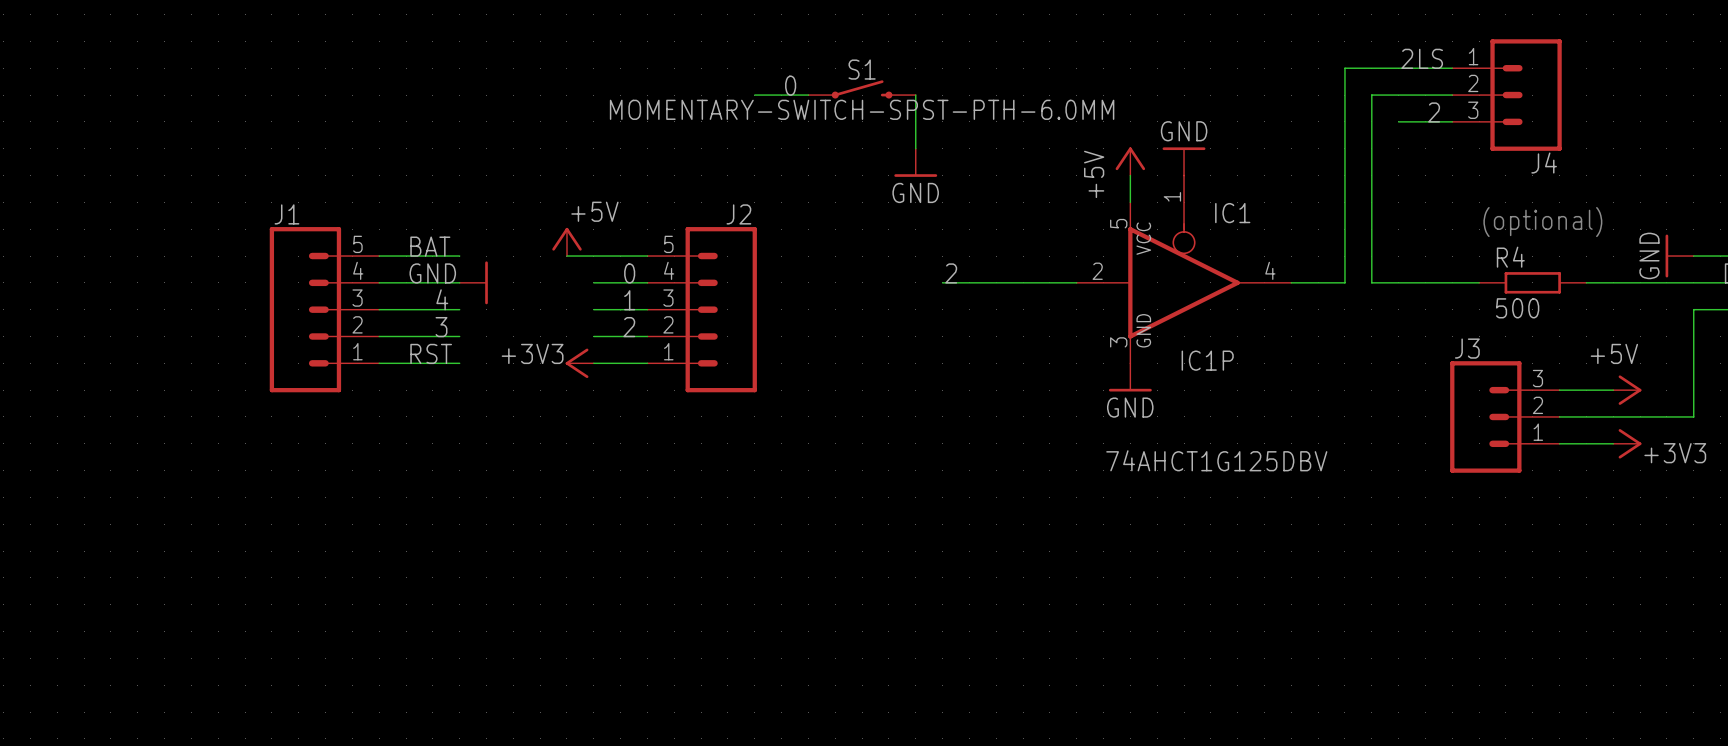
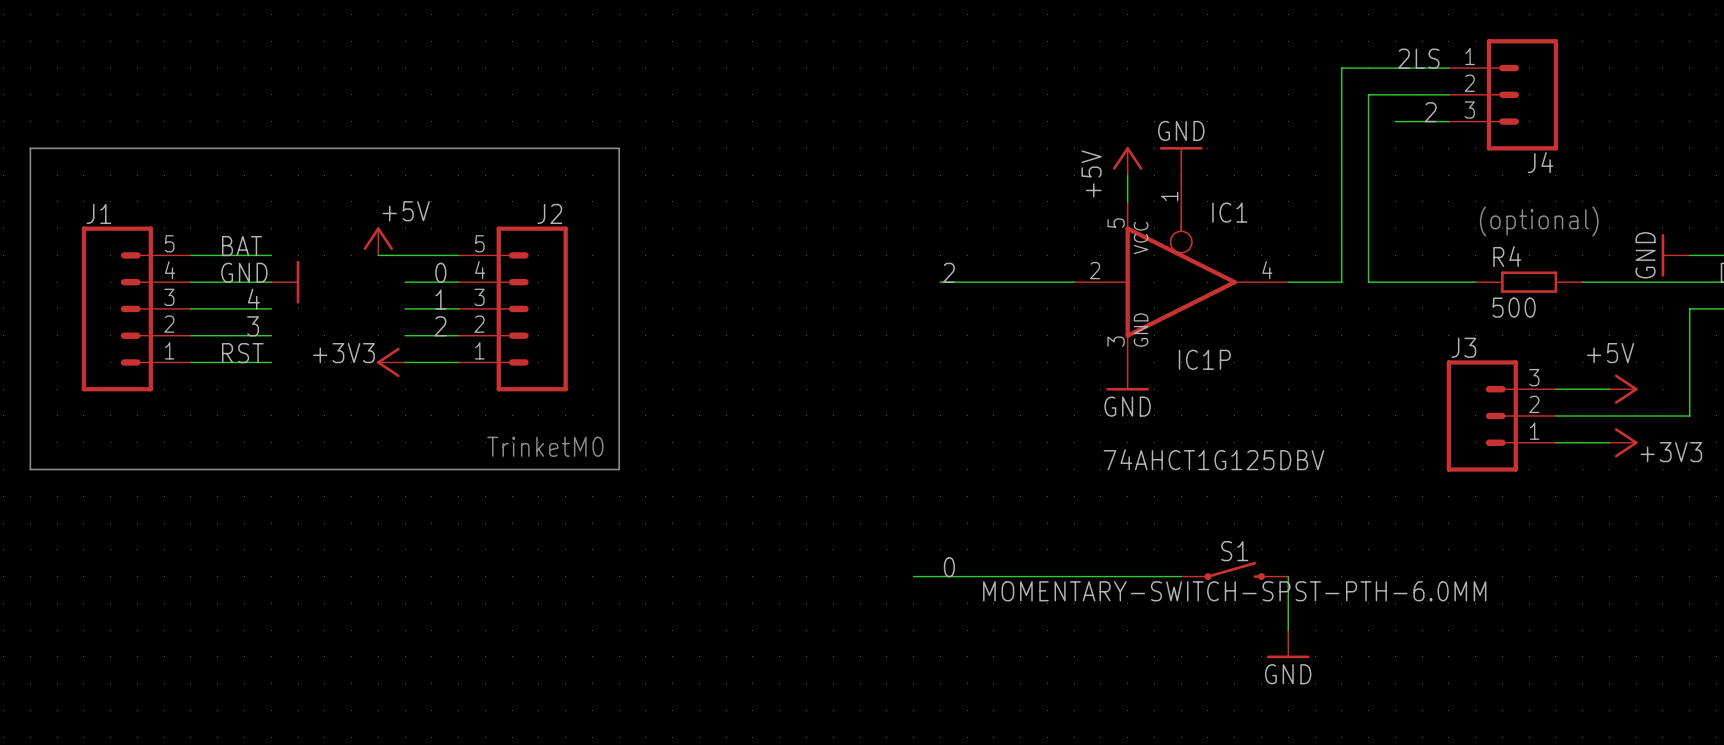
label: 0 (790, 85) -> none
S1 position: (862, 89) -> (1234, 570)
wire: (754, 95) (808, 95) -> none
wire: (915, 95) (915, 148) -> none
line: none -> (30, 148) (619, 148) (619, 469) (30, 469) (30, 148)
power symbol: GND (915, 162) -> none
power symbol position: +5V (566, 241) -> +5V (378, 241)
label position: BAT (430, 246) -> BAT (241, 246)
wire: none -> (190, 255) (271, 255)
wire: (566, 256) (647, 256) -> none
label position: GND (432, 273) -> GND (244, 272)
label position: 0 (629, 273) -> 0 (440, 272)
wire: none -> (190, 282) (271, 282)
wire: (379, 282) (406, 282) -> none
power symbol position: (473, 282) -> (285, 282)
wire: (593, 282) (647, 282) -> none
label: none -> 4 (253, 299)
label: 4 (442, 299) -> 1 (440, 299)
label: 1 (629, 300) -> none
wire: none -> (190, 308) (271, 308)
J1 position: (324, 309) -> (136, 308)
wire: (379, 309) (406, 309) -> none
wire: (593, 309) (647, 309) -> none
J2 position: (702, 309) -> (513, 308)
label: none -> 3 (253, 326)
label: 3 (441, 327) -> 2 (440, 326)
label: 2 (629, 327) -> none
wire: none -> (190, 335) (271, 335)
wire: (379, 336) (406, 336) -> none
wire: (593, 336) (647, 336) -> none
label position: RST (431, 353) -> RST (242, 353)
wire: none -> (190, 362) (271, 362)
power symbol position: +3V3 (579, 363) -> +3V3 (391, 362)
wire: (593, 363) (647, 363) -> none
text: none -> TrinketM0 (545, 446)
label: none -> 0 (949, 567)
wire: none -> (913, 576) (1181, 576)
wire: none -> (1288, 576) (1288, 630)
power symbol: none -> GND (1288, 644)

